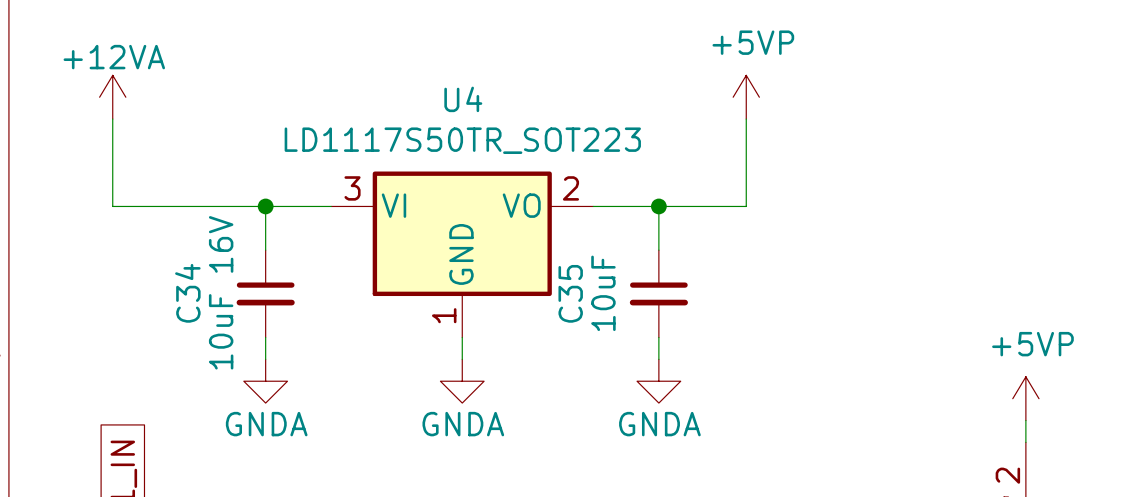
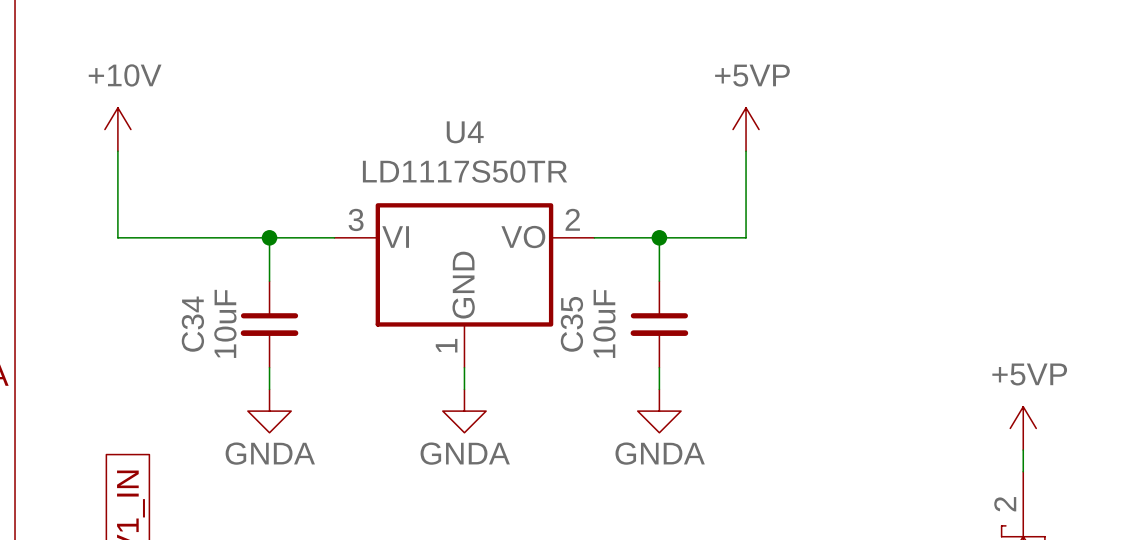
power symbol: +12VA (112, 97) -> +10V (117, 129)
U4 value: LD1117S50TR_SOT223 (462, 140) -> LD1117S50TR (465, 171)
C34 value: 10uF 16V (221, 292) -> 10uF (225, 323)

